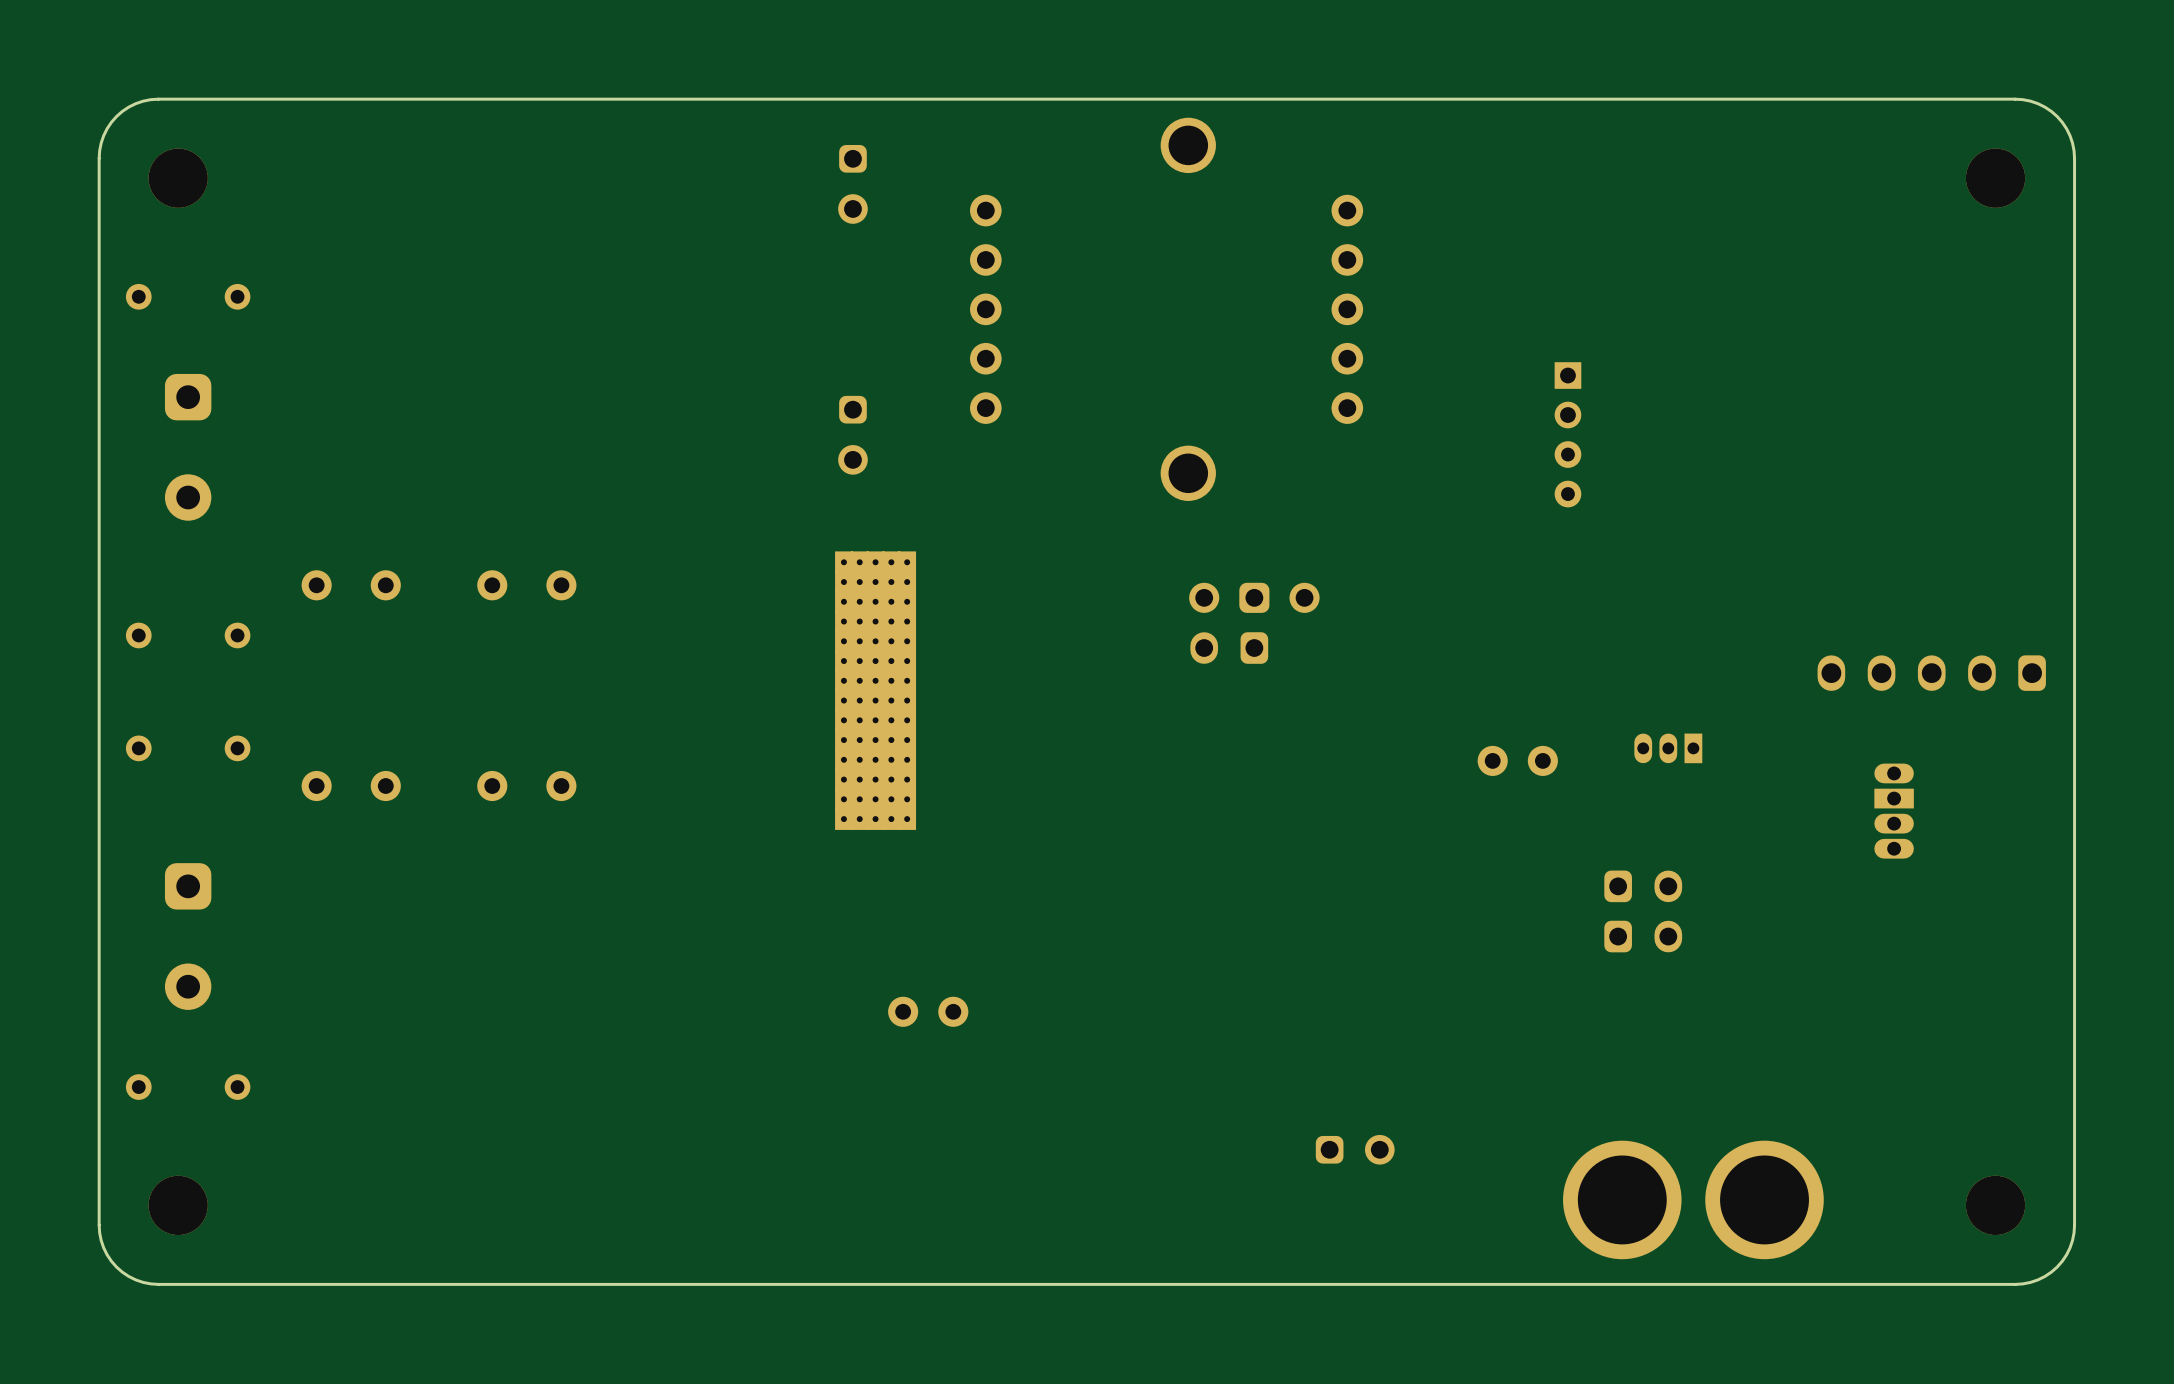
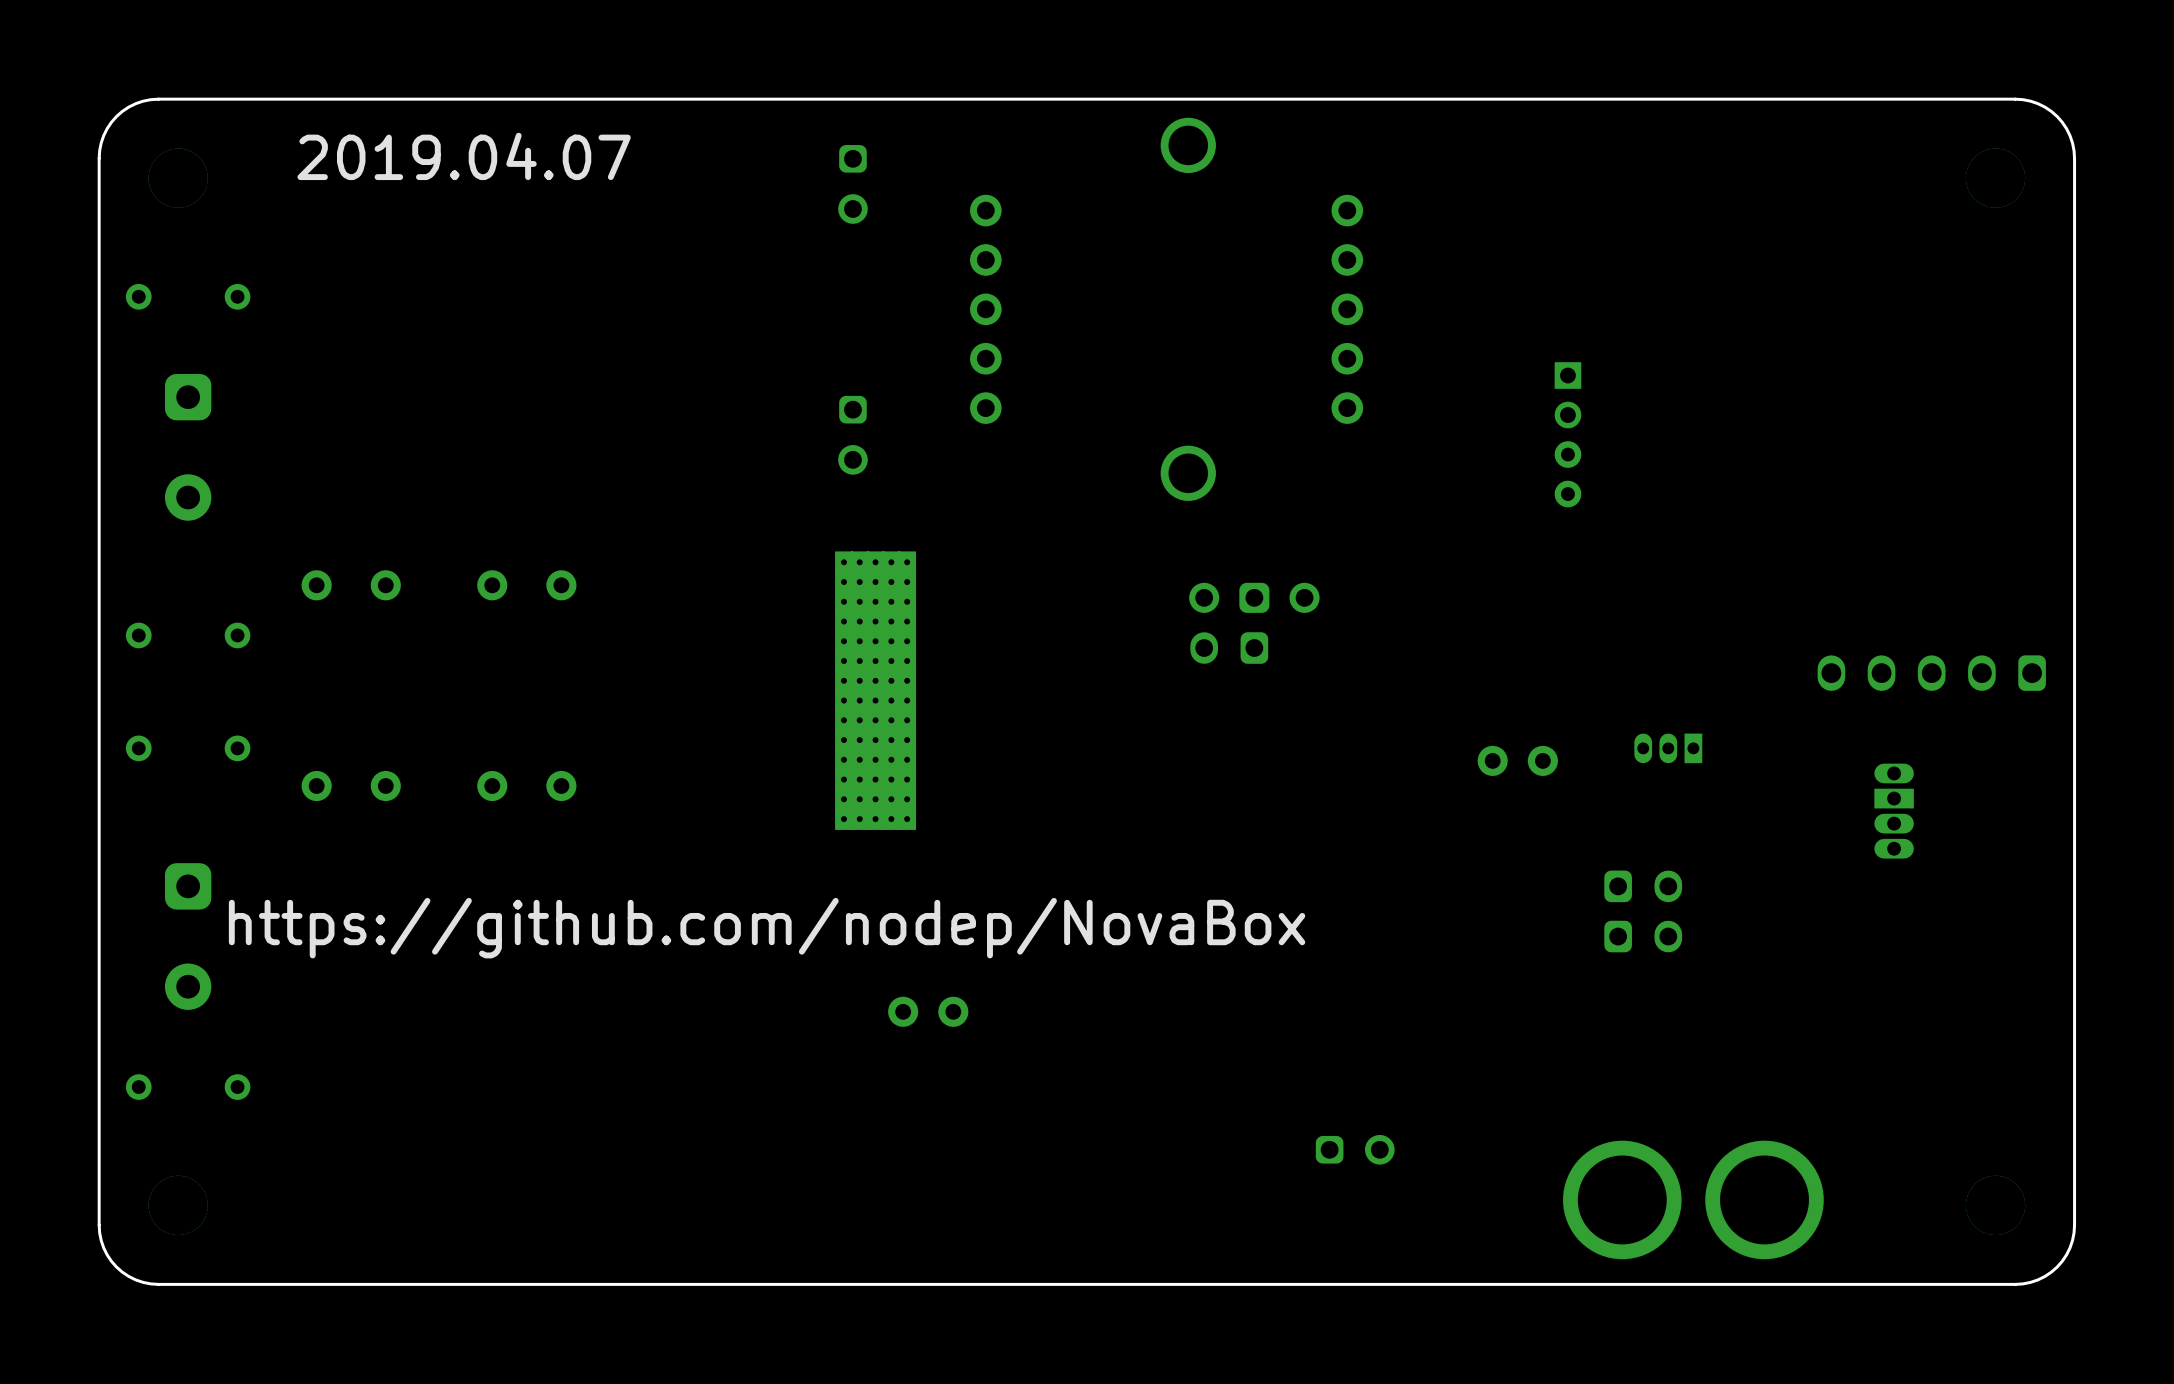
text: none -> 2019.04.07 (464, 156)
text: none -> https://github.com/nodep/NovaBox (767, 928)

